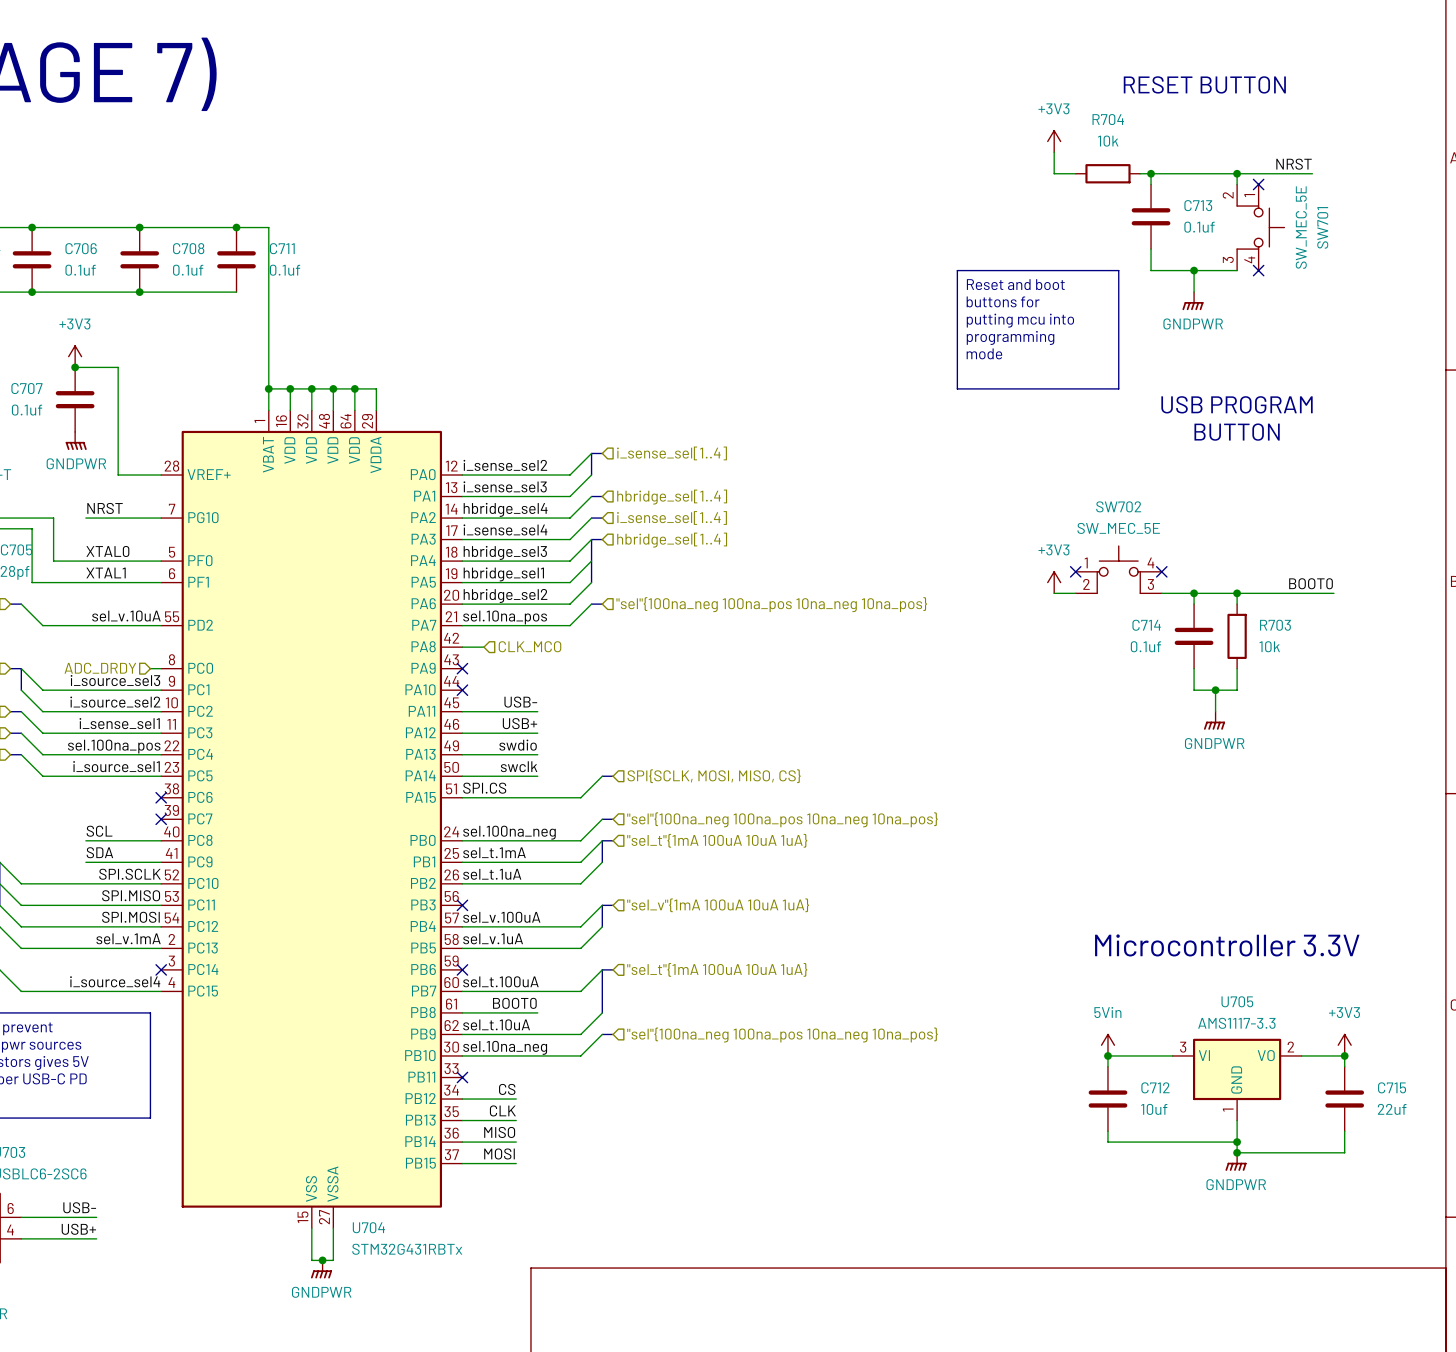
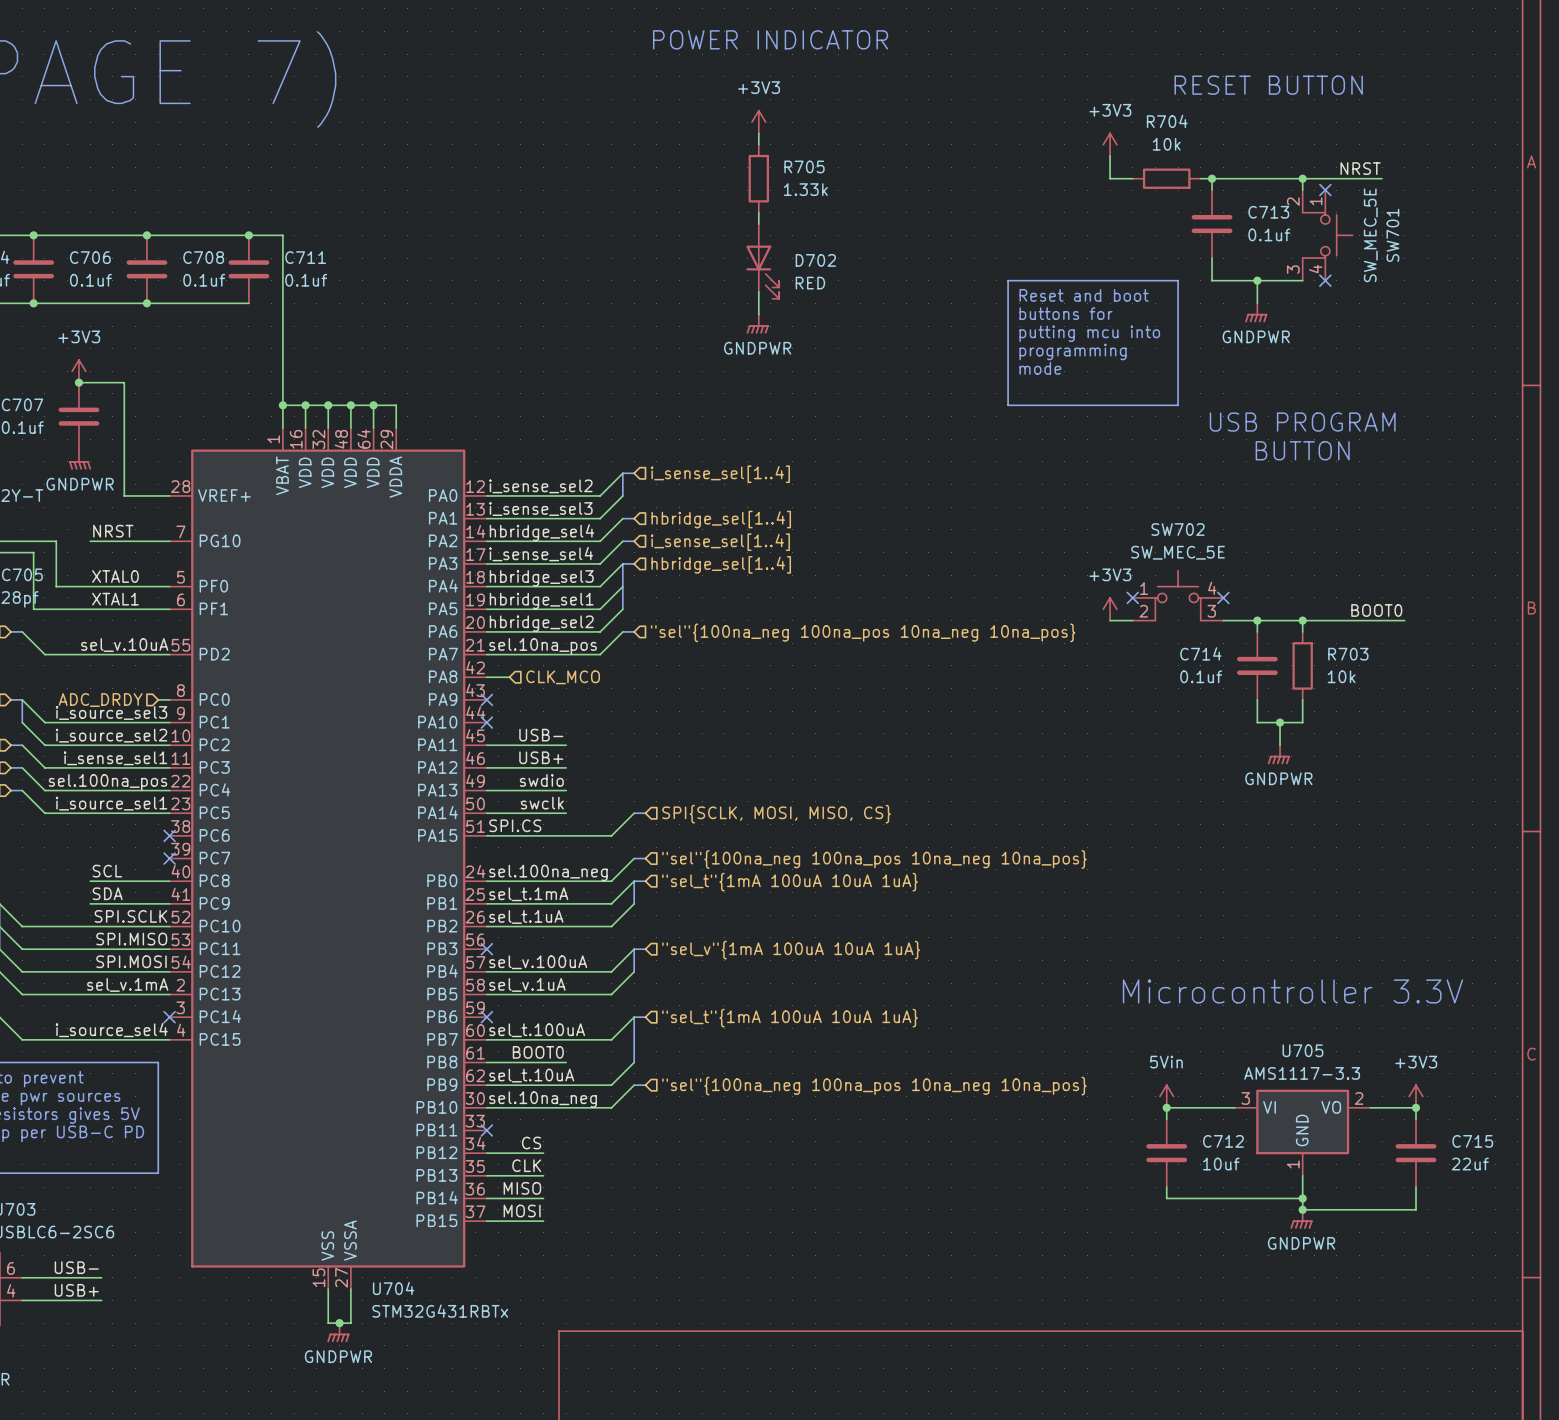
text: none -> POWER INDICATOR (770, 39)
power symbol: none -> +3V3 (758, 122)
wire: none -> (758, 133) (758, 144)
R705: none -> 1.33k (758, 178)
wire: none -> (758, 212) (758, 224)
D702: none -> RED (762, 261)
wire: none -> (758, 292) (758, 314)
power symbol: none -> GNDPWR (757, 324)

